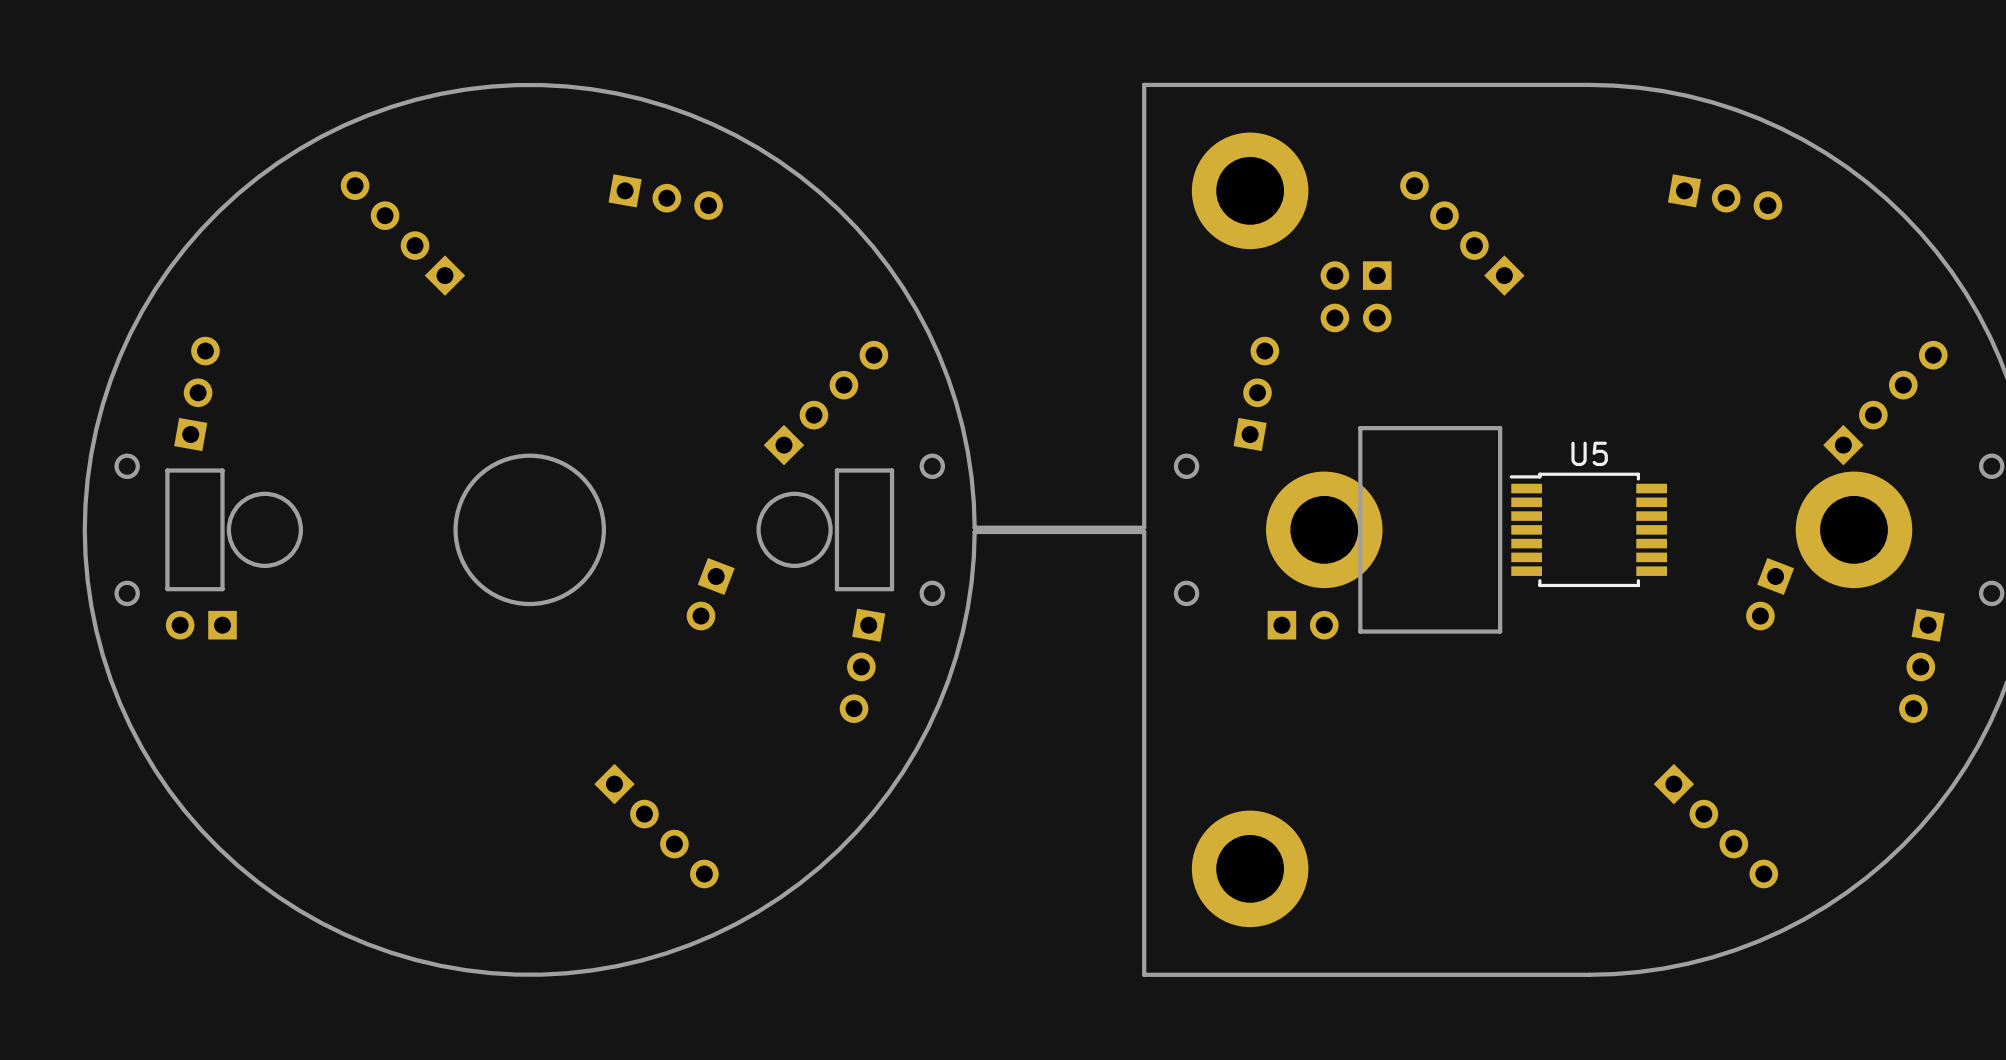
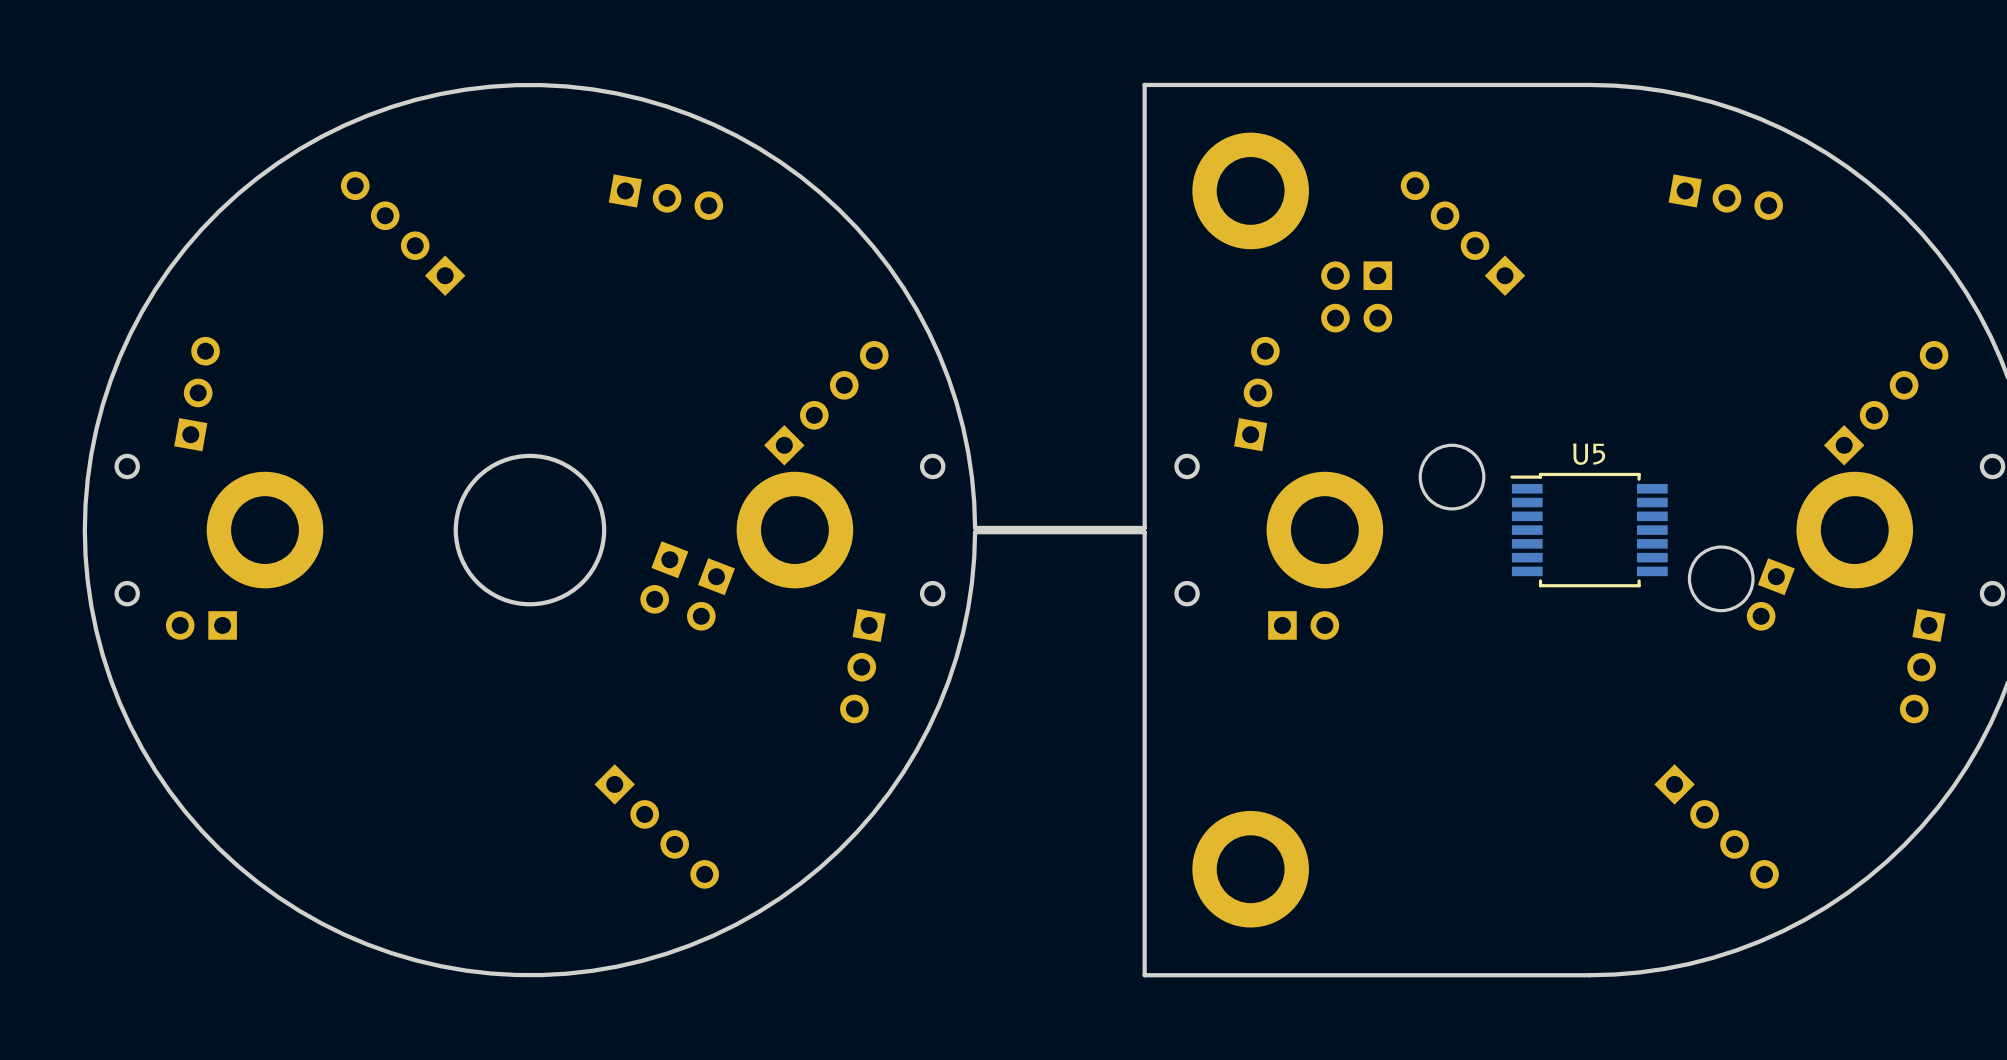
board edge: (1500, 428) (1360, 428) (1360, 631) (1500, 631) (1500, 428) -> none
round board edge: none -> [1418, 443, 1486, 511]
board edge: (222, 470) (167, 470) (167, 589) (222, 589) (222, 470) -> none
board edge: (892, 470) (836, 470) (836, 589) (892, 589) (892, 470) -> none
round board edge: [226, 491, 304, 568] -> none
round board edge: [756, 491, 833, 568] -> none
part: none -> (264, 530)
part: none -> (794, 530)
round board edge: none -> [1687, 545, 1755, 613]
part: none -> (664, 577)

